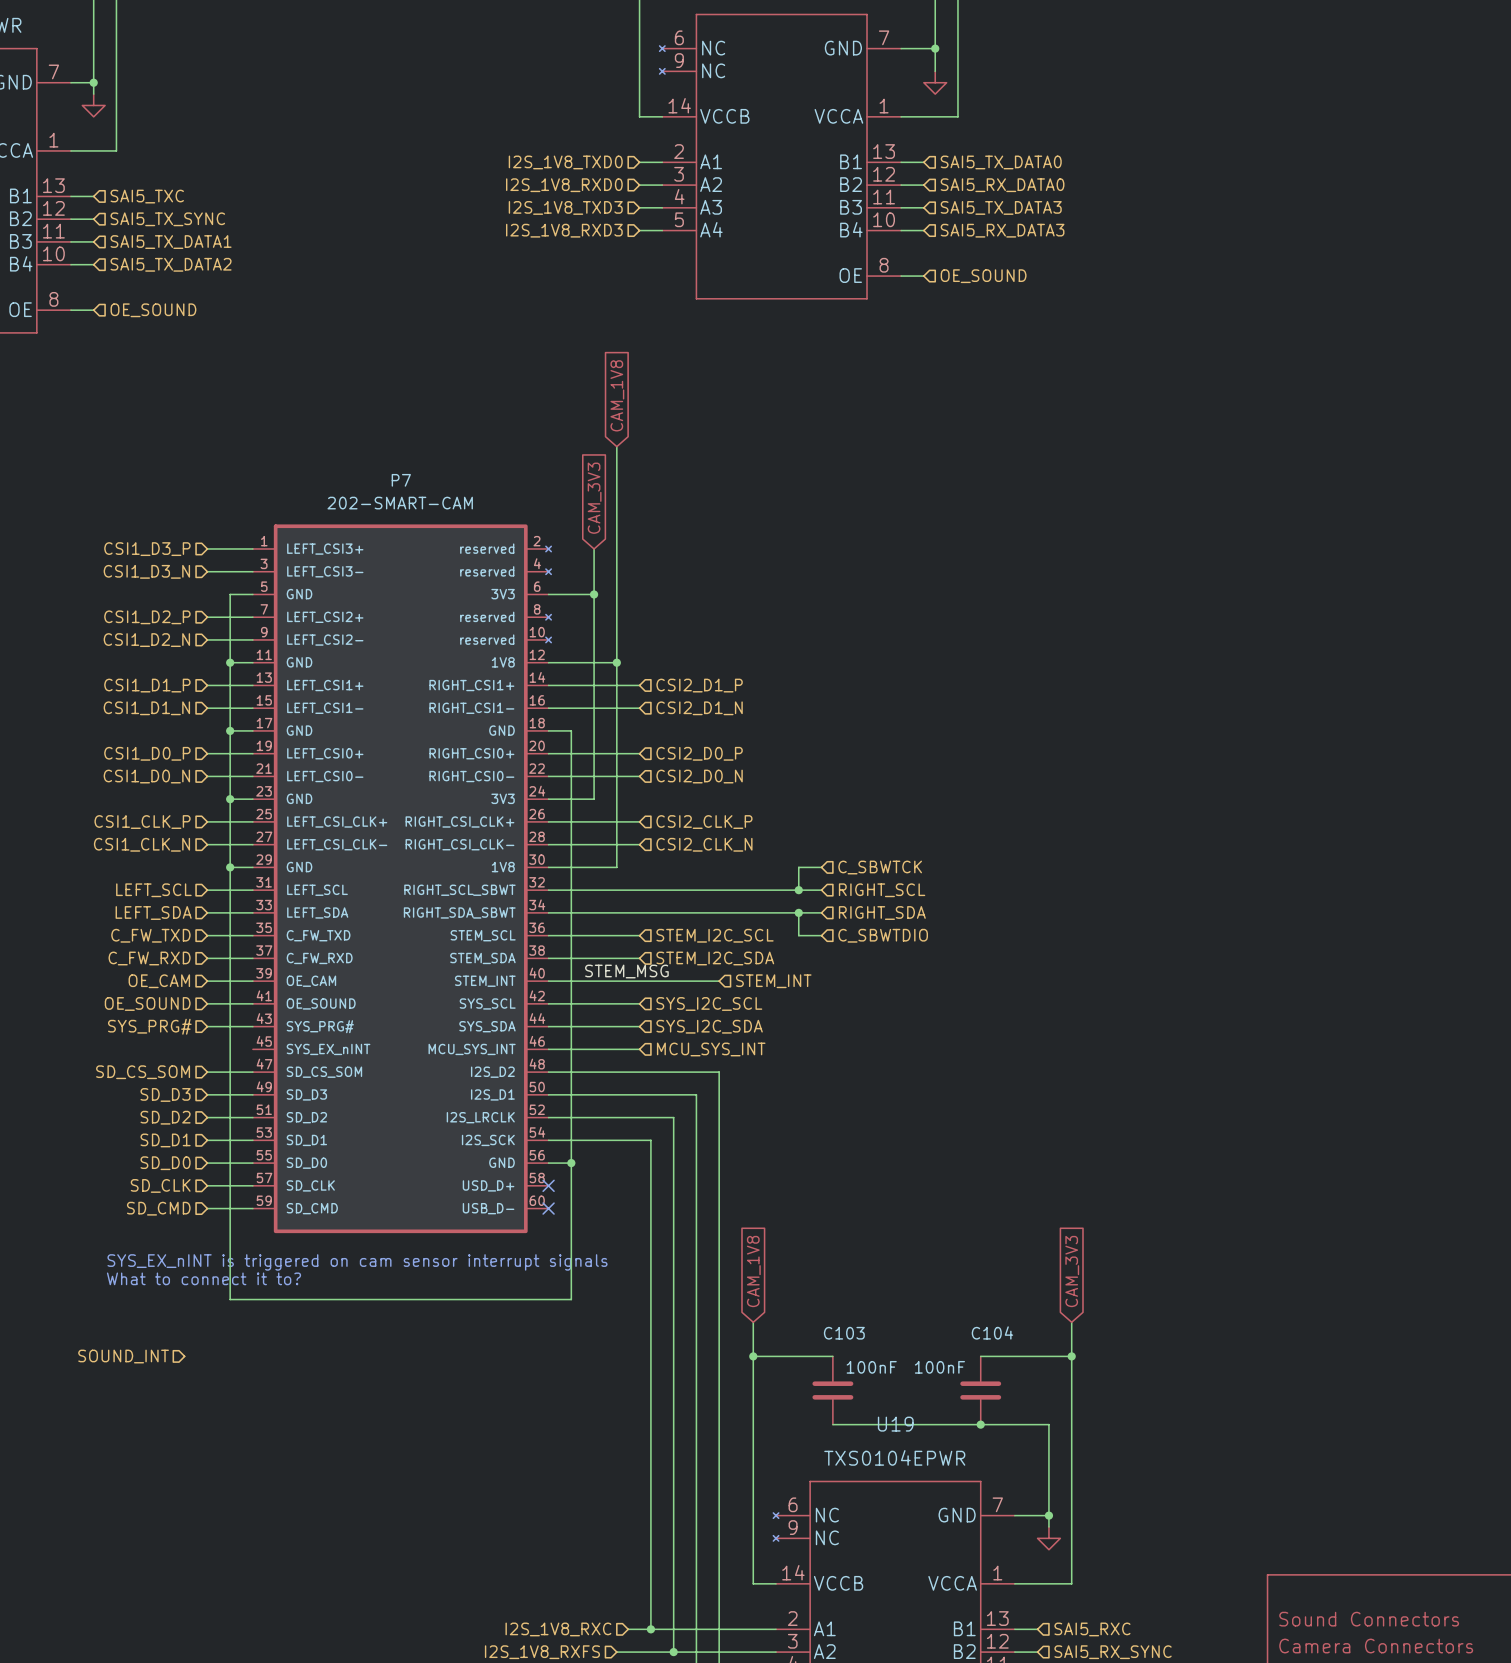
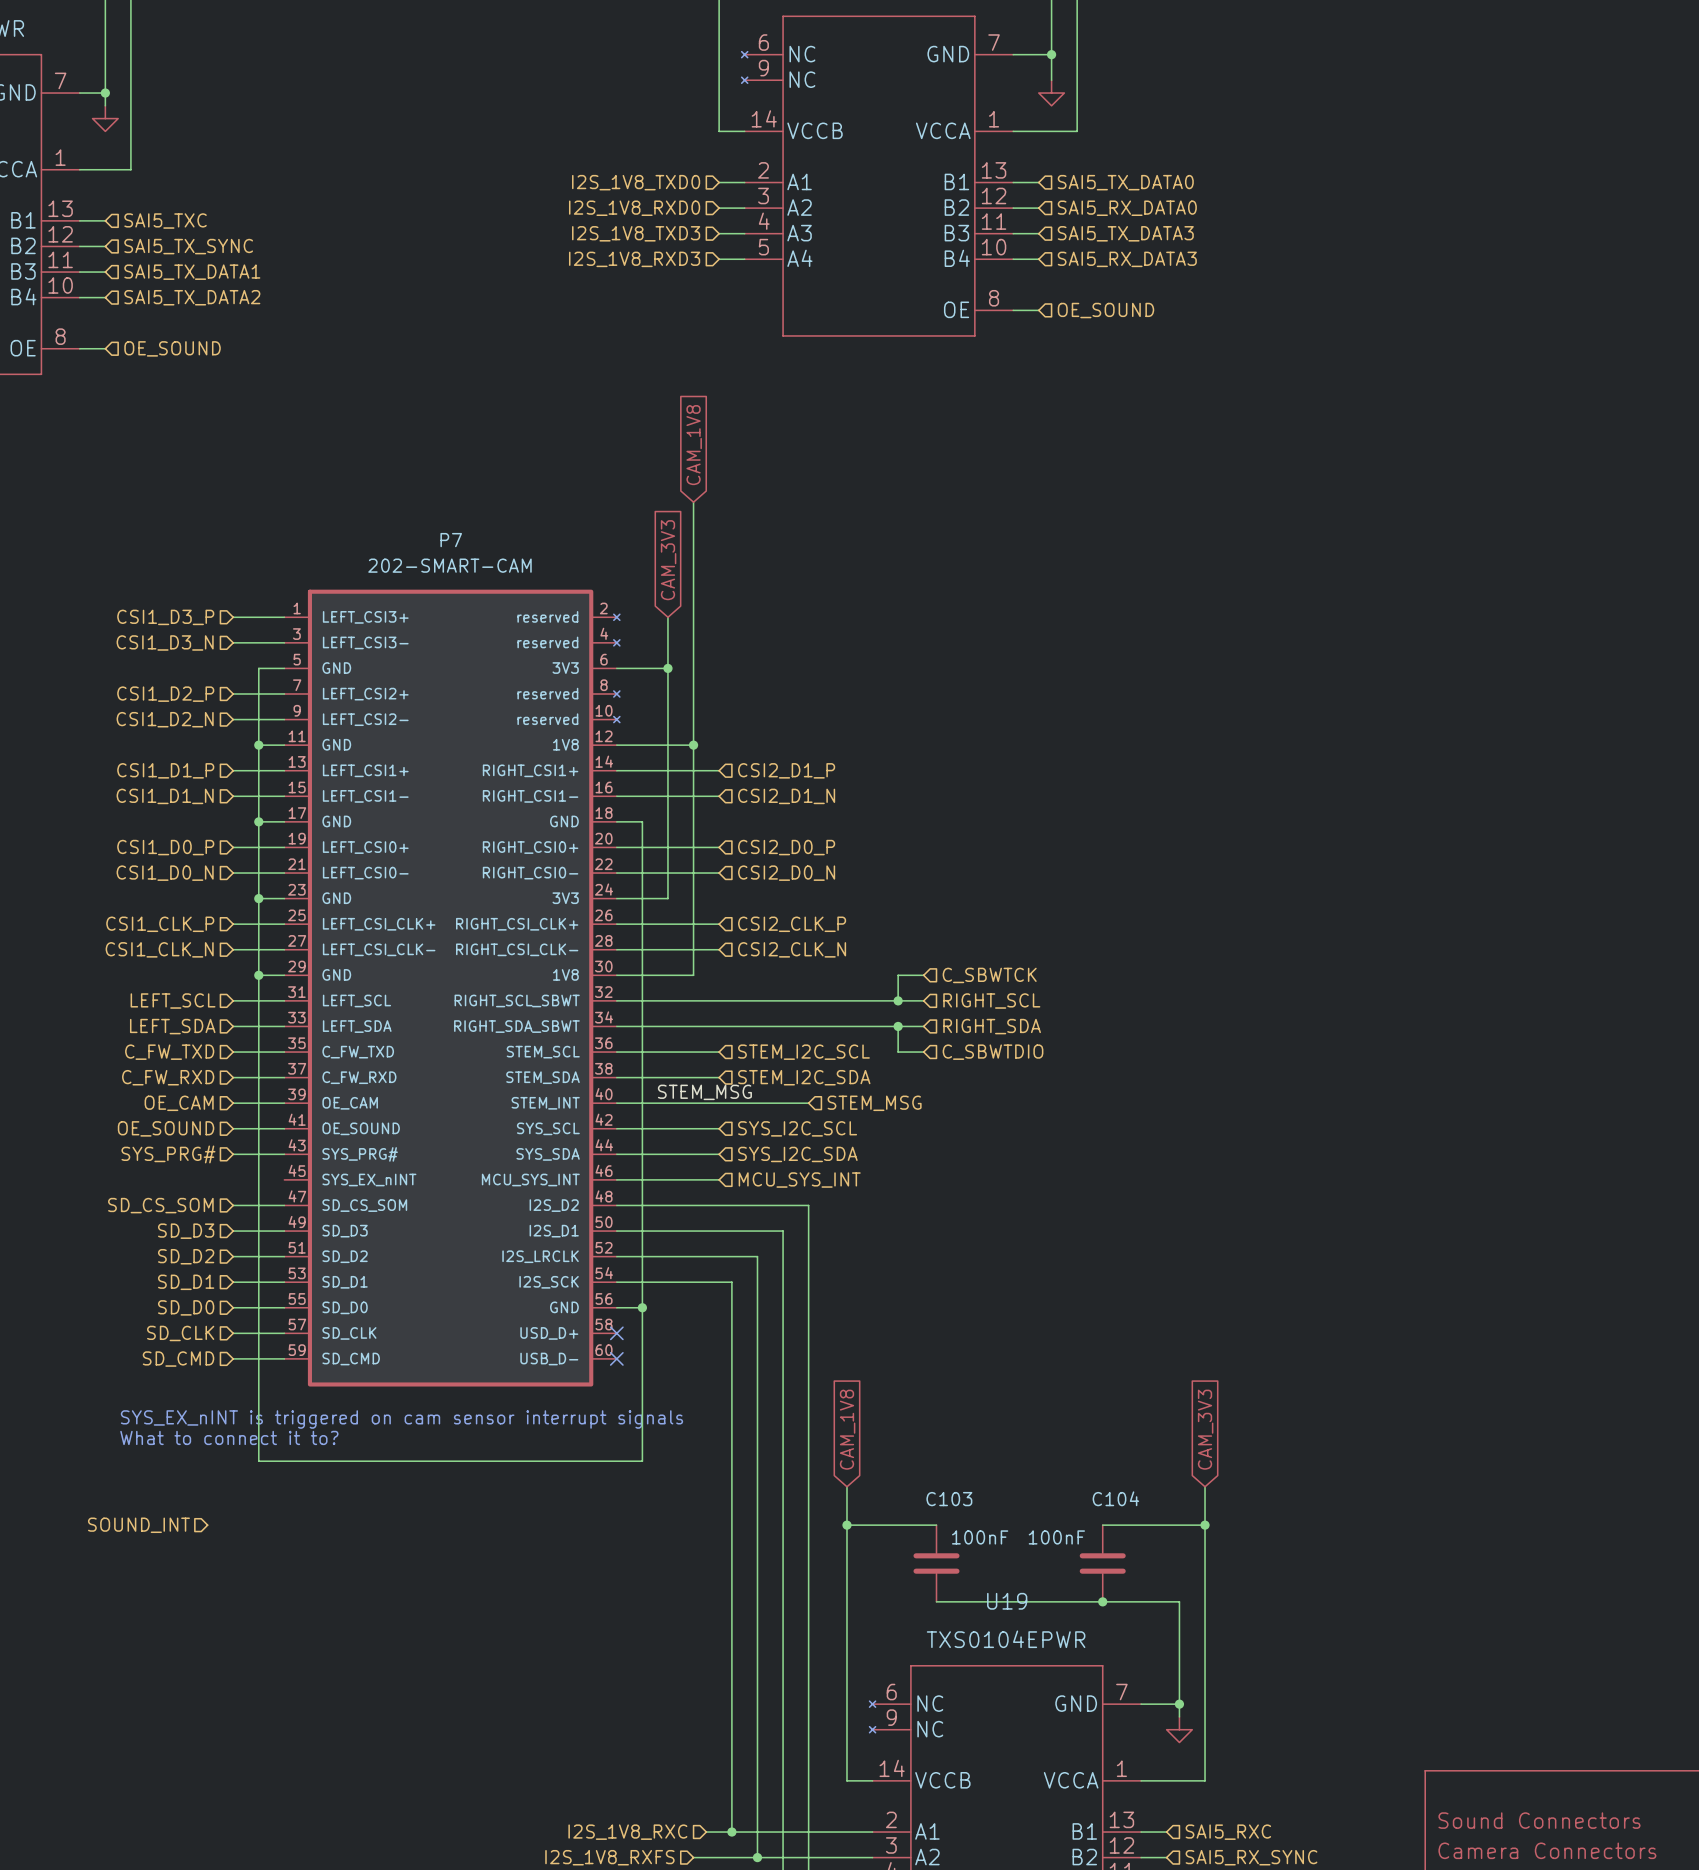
hierarchical label: STEM_INT (773, 981) -> STEM_MSG (874, 1103)

